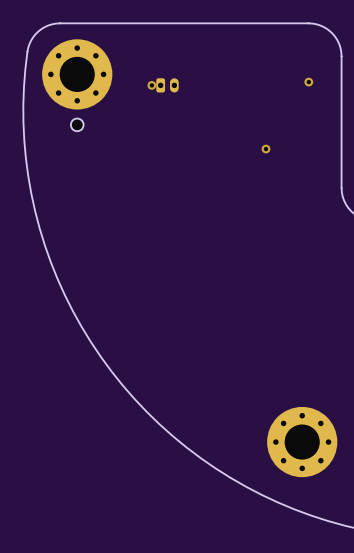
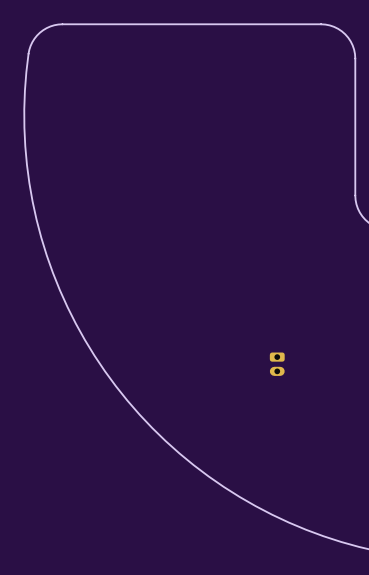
part: (77, 74) -> none
via: (308, 82) -> none
via: (151, 85) -> none
part: (167, 85) -> none
part: (77, 124) -> none
via: (266, 149) -> none
part: none -> (277, 364)
part: (302, 442) -> none

